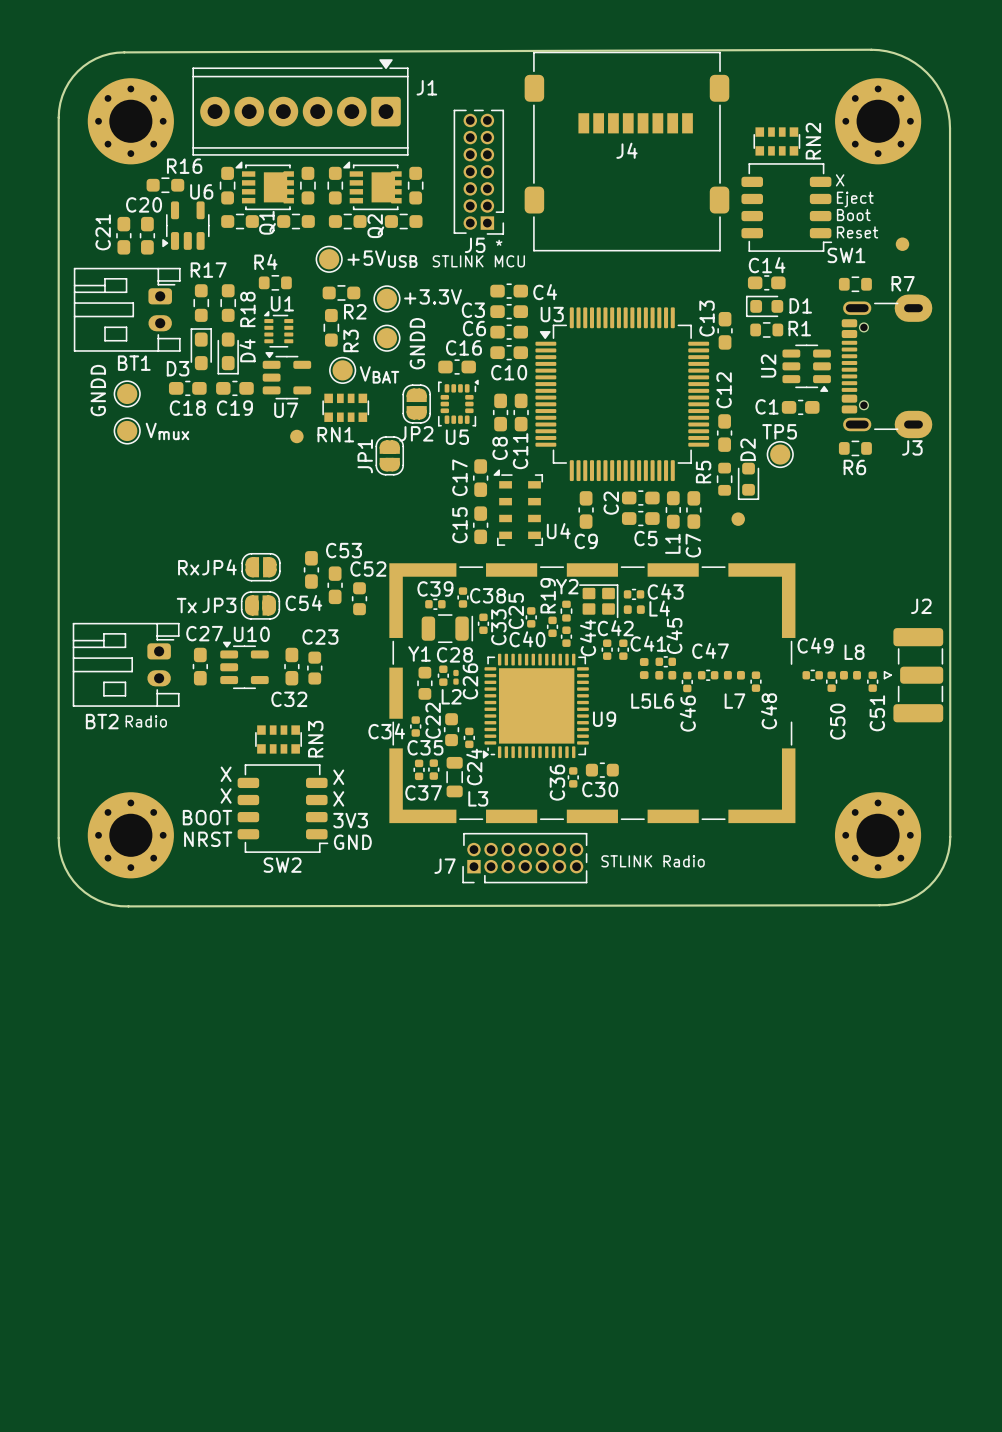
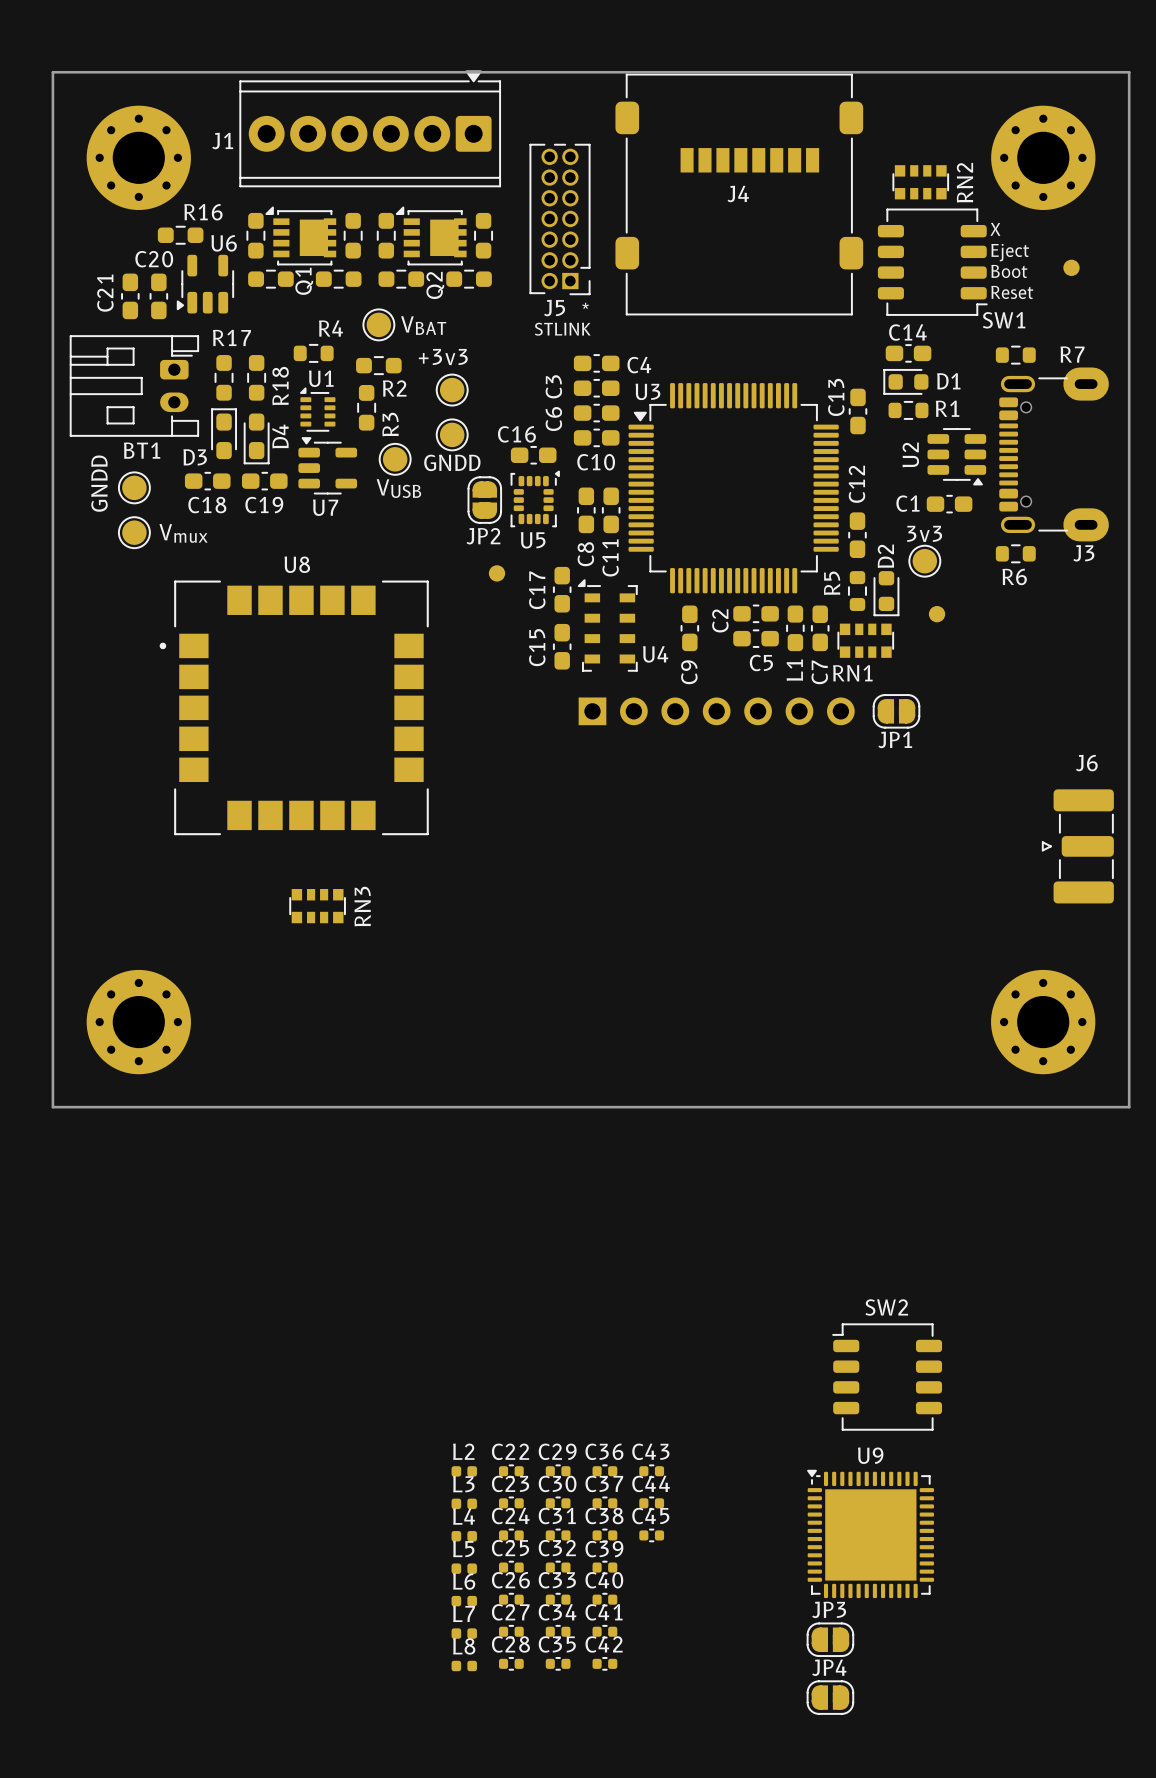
board edge: none -> (52, 72) (1129, 72) (1129, 1107) (52, 1107) (52, 72)
board edge: (124, 52) (871, 49) (886, 51) (901, 55) (915, 63) (926, 72) (936, 84) (944, 98) (948, 113) (950, 128) (950, 836) (948, 852) (943, 867) (929, 886) (910, 899) (887, 905) (128, 906) (112, 905) (98, 900) (78, 887) (69, 875) (62, 861) (58, 837) (58, 117) -> none
board edge: (124, 52) (109, 53) (95, 58) (77, 71) (65, 89) (60, 103) (58, 117) -> none
J1 name position: J1 (426, 87) -> J1 (222, 141)
J1 position: (300, 107) -> (370, 128)
part position: (902, 244) -> (1071, 267)
+5VUSB name: +5VUSB (382, 259) -> VBAT (423, 325)
R4 name position: R4 (265, 261) -> R4 (330, 328)
text: STLINK MCU (478, 261) -> STLINK (562, 329)
R2 position: (341, 292) -> (378, 365)
+3.3V: (386, 298) -> none
C3 name rotation: 0° (473, 310) -> 90° counterclockwise (553, 386)
+3v3: none -> (452, 390)
R3 position: (331, 327) -> (366, 407)
C6 name rotation: 0° (474, 328) -> 90° counterclockwise (553, 419)
GNDD position: (386, 338) -> (452, 434)
GNDD name rotation: 0° (417, 343) -> 90° clockwise (452, 462)
C16 name position: C16 (463, 347) -> C16 (516, 434)
VBAT name: VBAT (379, 374) -> VUSB (398, 488)
RN1 position: (345, 407) -> (865, 640)
TP5 name: TP5 (779, 431) -> 3v3 (924, 533)
part position: (296, 436) -> (497, 573)
JP1 rotation: 0° (389, 455) -> 90° clockwise (896, 711)
JP1 position: (389, 455) -> (896, 711)
JP1 name position: JP1 (365, 456) -> JP1 (895, 739)
part position: (738, 519) -> (937, 614)
C9 name rotation: 0° (586, 541) -> 90° counterclockwise (689, 672)
text: Rx (188, 567) -> none
JP4 name position: JP4 (219, 567) -> JP4 (829, 1667)
JP4 position: (261, 567) -> (830, 1697)
C54: (311, 569) -> none
U8: none -> (294, 707)
part: none -> (716, 711)
C53: (335, 585) -> none
C43 name position: C43 (665, 591) -> C43 (650, 1451)
C43 position: (634, 594) -> (651, 1471)
C38 name position: C38 (488, 595) -> C38 (604, 1516)
C38 rotation: 0° (463, 597) -> 90° clockwise (604, 1535)
C38 position: (463, 597) -> (604, 1535)
C52: (359, 598) -> none
Y2: (598, 601) -> none
C39 position: (435, 604) -> (604, 1567)
text: Tx (186, 605) -> none
JP3 name position: JP3 (219, 605) -> JP3 (829, 1609)
JP3 position: (260, 605) -> (830, 1639)
L4 name position: L4 (659, 608) -> L4 (464, 1516)
L4 position: (634, 609) -> (464, 1536)
R19: (566, 611) -> none
C25 rotation: 0° (531, 617) -> 90° clockwise (511, 1567)
C25 position: (531, 617) -> (511, 1567)
C33 rotation: 0° (483, 623) -> 90° clockwise (558, 1599)
C33 position: (483, 623) -> (558, 1599)
C40 rotation: 0° (552, 626) -> 90° clockwise (604, 1599)
C40 position: (552, 626) -> (604, 1599)
Y1: (447, 628) -> none
C44 rotation: 0° (566, 636) -> 90° clockwise (651, 1503)
C44 position: (566, 636) -> (651, 1503)
C45 name rotation: 0° (674, 636) -> 90° clockwise (650, 1516)
C44 name position: C44 (588, 637) -> C44 (651, 1483)
C41 name position: C41 (648, 643) -> C41 (604, 1612)
C27 footprint: [192, 647, 209, 686] -> [498, 1624, 524, 1639]
C32 footprint: [284, 647, 300, 686] -> [545, 1560, 571, 1575]
C42 rotation: 0° (607, 649) -> 90° clockwise (604, 1663)
C42 position: (607, 649) -> (604, 1663)
C41 rotation: 0° (623, 649) -> 90° clockwise (604, 1631)
C41 position: (623, 649) -> (604, 1631)
C23 footprint: [307, 651, 323, 685] -> [498, 1496, 524, 1511]
L8 name position: L8 (854, 652) -> L8 (464, 1646)
C45 position: (665, 661) -> (651, 1535)
BT2: (126, 664) -> none
U10: (244, 665) -> none
L2 footprint: [417, 666, 433, 700] -> [451, 1466, 477, 1477]
L5 rotation: 0° (644, 668) -> 90° clockwise (464, 1568)
L5 position: (644, 668) -> (464, 1568)
C26 footprint: [453, 669, 459, 685] -> [498, 1592, 524, 1607]
C28 rotation: 0° (443, 675) -> 90° clockwise (511, 1663)
C28 position: (443, 675) -> (511, 1663)
L6 position: (665, 675) -> (464, 1601)
C47: (708, 675) -> none
L7 position: (734, 675) -> (464, 1633)
C49: (812, 675) -> none
L8 position: (850, 675) -> (464, 1665)
J2: (913, 675) -> none
C48: (755, 681) -> none
C50: (831, 681) -> none
C51: (872, 681) -> none
C46: (687, 682) -> none
J6: none -> (1077, 846)
part: (592, 693) -> none
L2 name position: L2 (451, 696) -> L2 (463, 1451)
C32 name position: C32 (289, 699) -> C32 (557, 1548)
L5 name position: L5 (641, 701) -> L5 (463, 1549)
L6 name position: L6 (664, 701) -> L6 (464, 1581)
L7 name position: L7 (734, 701) -> L7 (464, 1613)
U9 rotation: 0° (535, 706) -> 90° clockwise (870, 1533)
U9 position: (535, 706) -> (870, 1533)
C22 footprint: [443, 713, 460, 747] -> [498, 1464, 524, 1479]
U9 name position: U9 (604, 719) -> U9 (870, 1455)
text: Radio (146, 721) -> none
C34 rotation: 0° (415, 726) -> 90° clockwise (558, 1631)
C34 position: (415, 726) -> (558, 1631)
C24 rotation: 0° (469, 737) -> 90° clockwise (511, 1535)
C24 position: (469, 737) -> (511, 1535)
L3 footprint: [446, 756, 464, 798] -> [451, 1498, 477, 1510]
C30 footprint: [585, 762, 619, 778] -> [545, 1496, 571, 1511]
C24 name position: C24 (474, 766) -> C24 (510, 1516)
C37 rotation: 0° (419, 769) -> 90° clockwise (604, 1503)
C37 position: (419, 769) -> (604, 1503)
C35 rotation: 0° (433, 769) -> 90° clockwise (558, 1663)
C35 position: (433, 769) -> (558, 1663)
text: X (226, 774) -> none
text: X (338, 777) -> none
C36 rotation: 0° (573, 777) -> 90° clockwise (604, 1471)
C36 position: (573, 777) -> (604, 1471)
C30 name position: C30 (600, 789) -> C30 (557, 1483)
C37 name position: C37 (423, 792) -> C37 (604, 1483)
text: X (226, 795) -> none
text: X (338, 798) -> none
L3 name position: L3 (478, 798) -> L3 (463, 1484)
SW2 rotation: 0° (283, 808) -> 180° (887, 1377)
SW2 position: (283, 808) -> (887, 1377)
text: BOOT (207, 817) -> none
text: 3V3 (350, 820) -> none
text: NRST (208, 839) -> none
text: GND (352, 842) -> none
J7: (524, 858) -> none
text: STLINK Radio (653, 861) -> none
C29: none -> (558, 1471)
C31: none -> (558, 1535)

